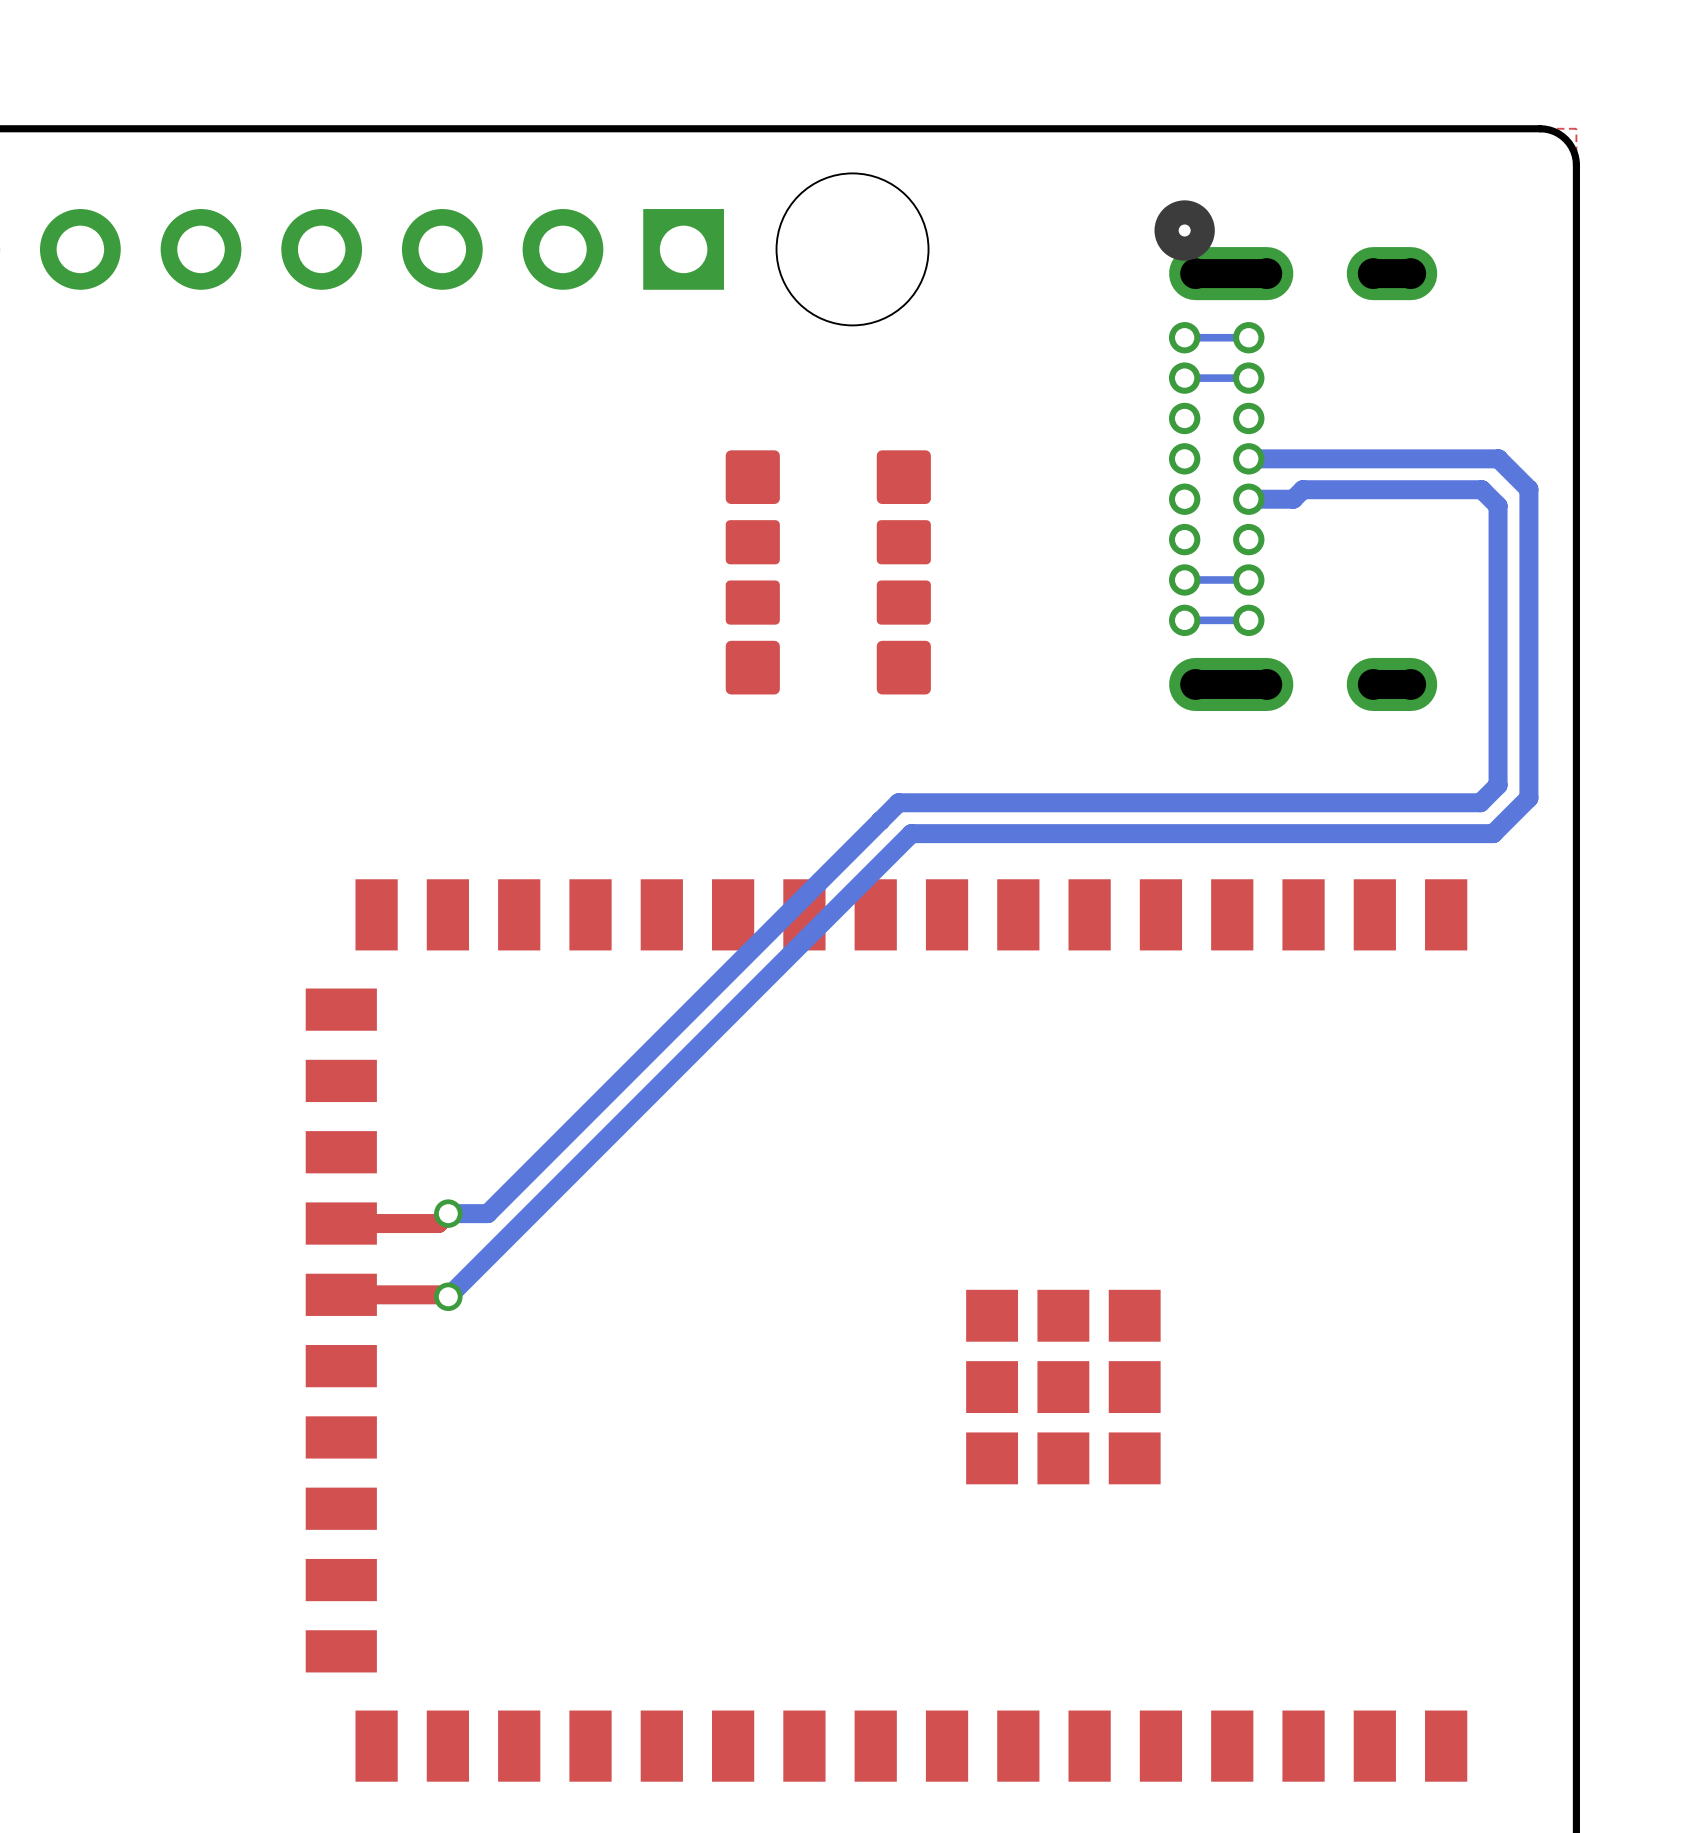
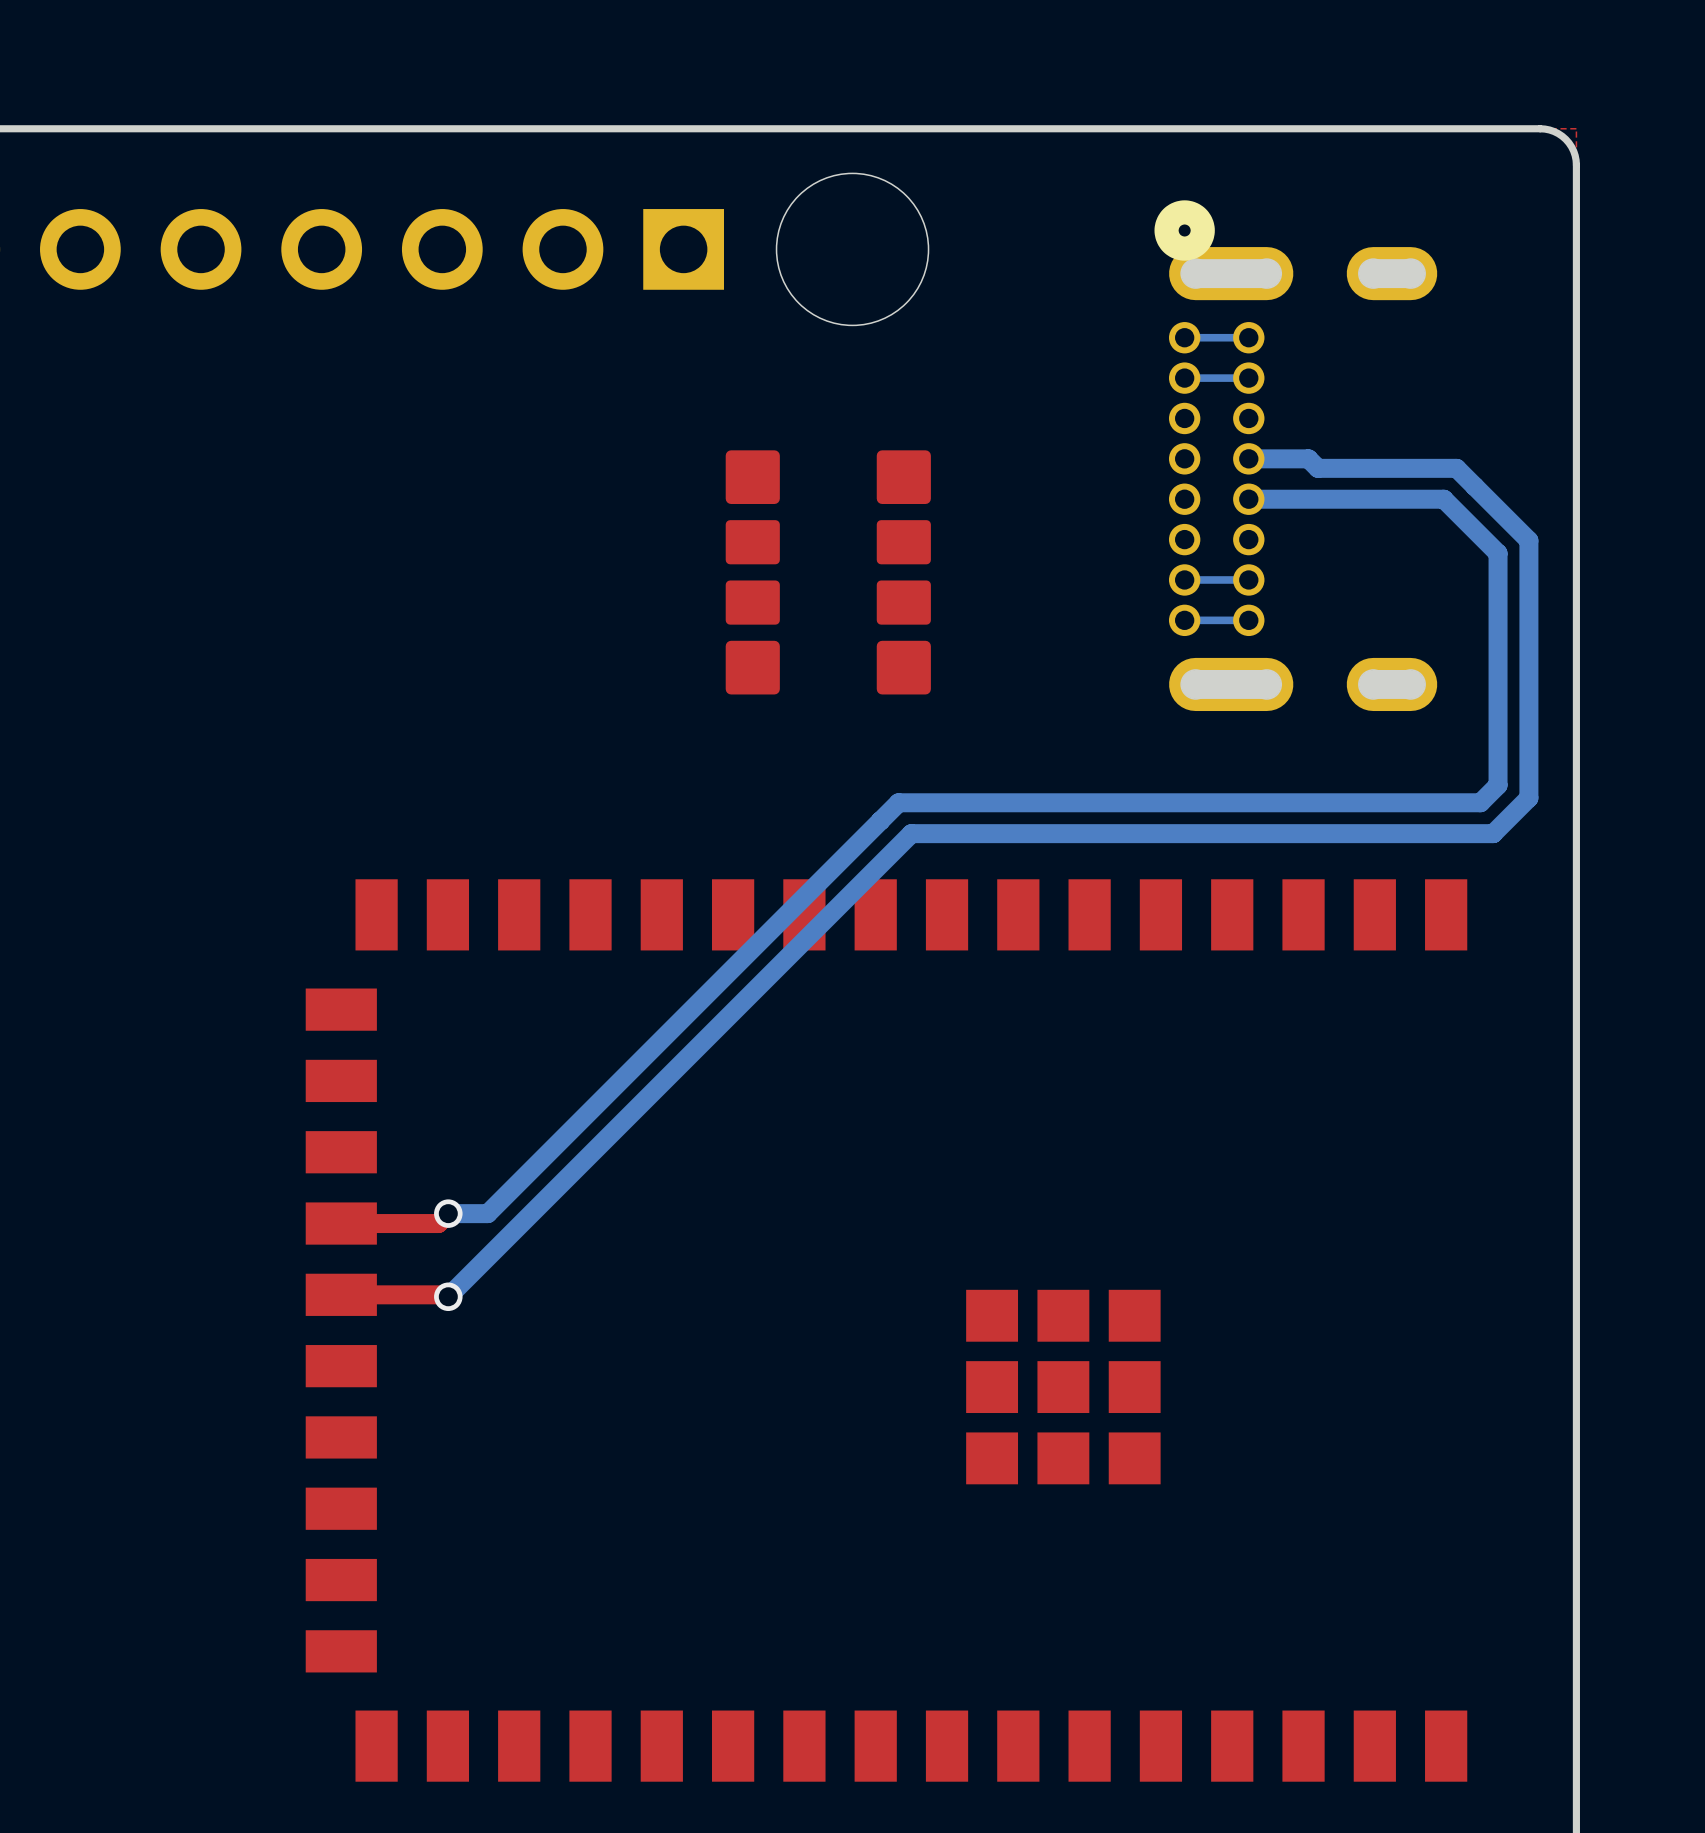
bottom track: (1308, 458) (1498, 458) (1528, 489) (1528, 540) -> (1308, 458) (1317, 468) (1456, 468) (1528, 540)
bottom track: (1293, 499) (1302, 489) (1481, 489) (1498, 505) (1498, 553) -> (1293, 499) (1443, 499) (1498, 553)

